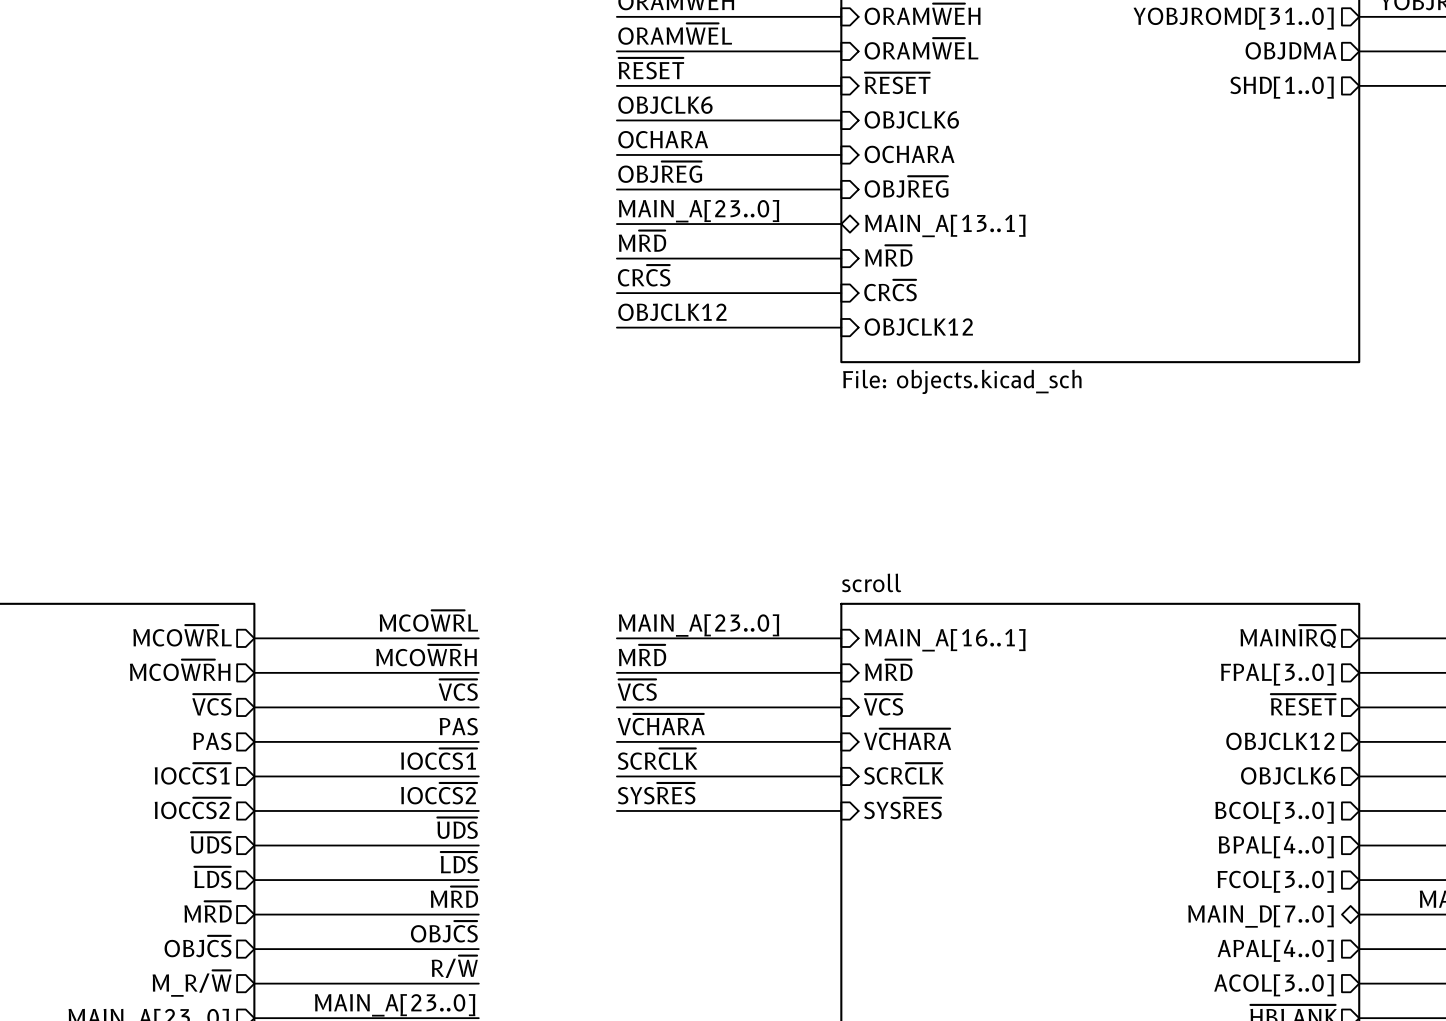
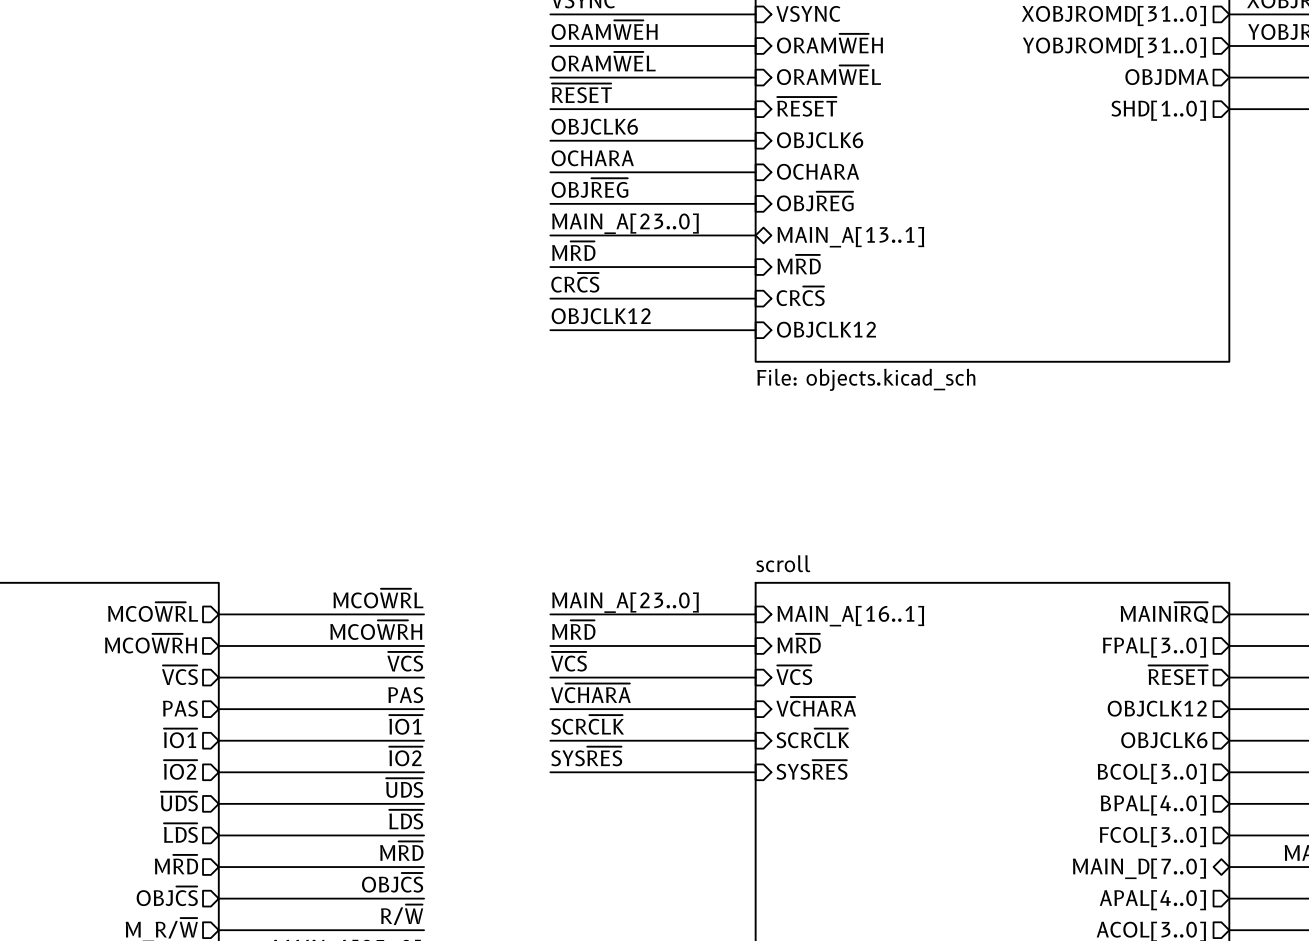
label: IOC~{CS1} (439, 759) -> ~{IO1} (405, 724)
sheet pin: IOC~{CS1} (192, 773) -> ~{IO1} (180, 738)
label: IOC~{CS2} (439, 793) -> ~{IO2} (405, 756)
sheet pin: IOC~{CS2} (192, 808) -> ~{IO2} (180, 769)

